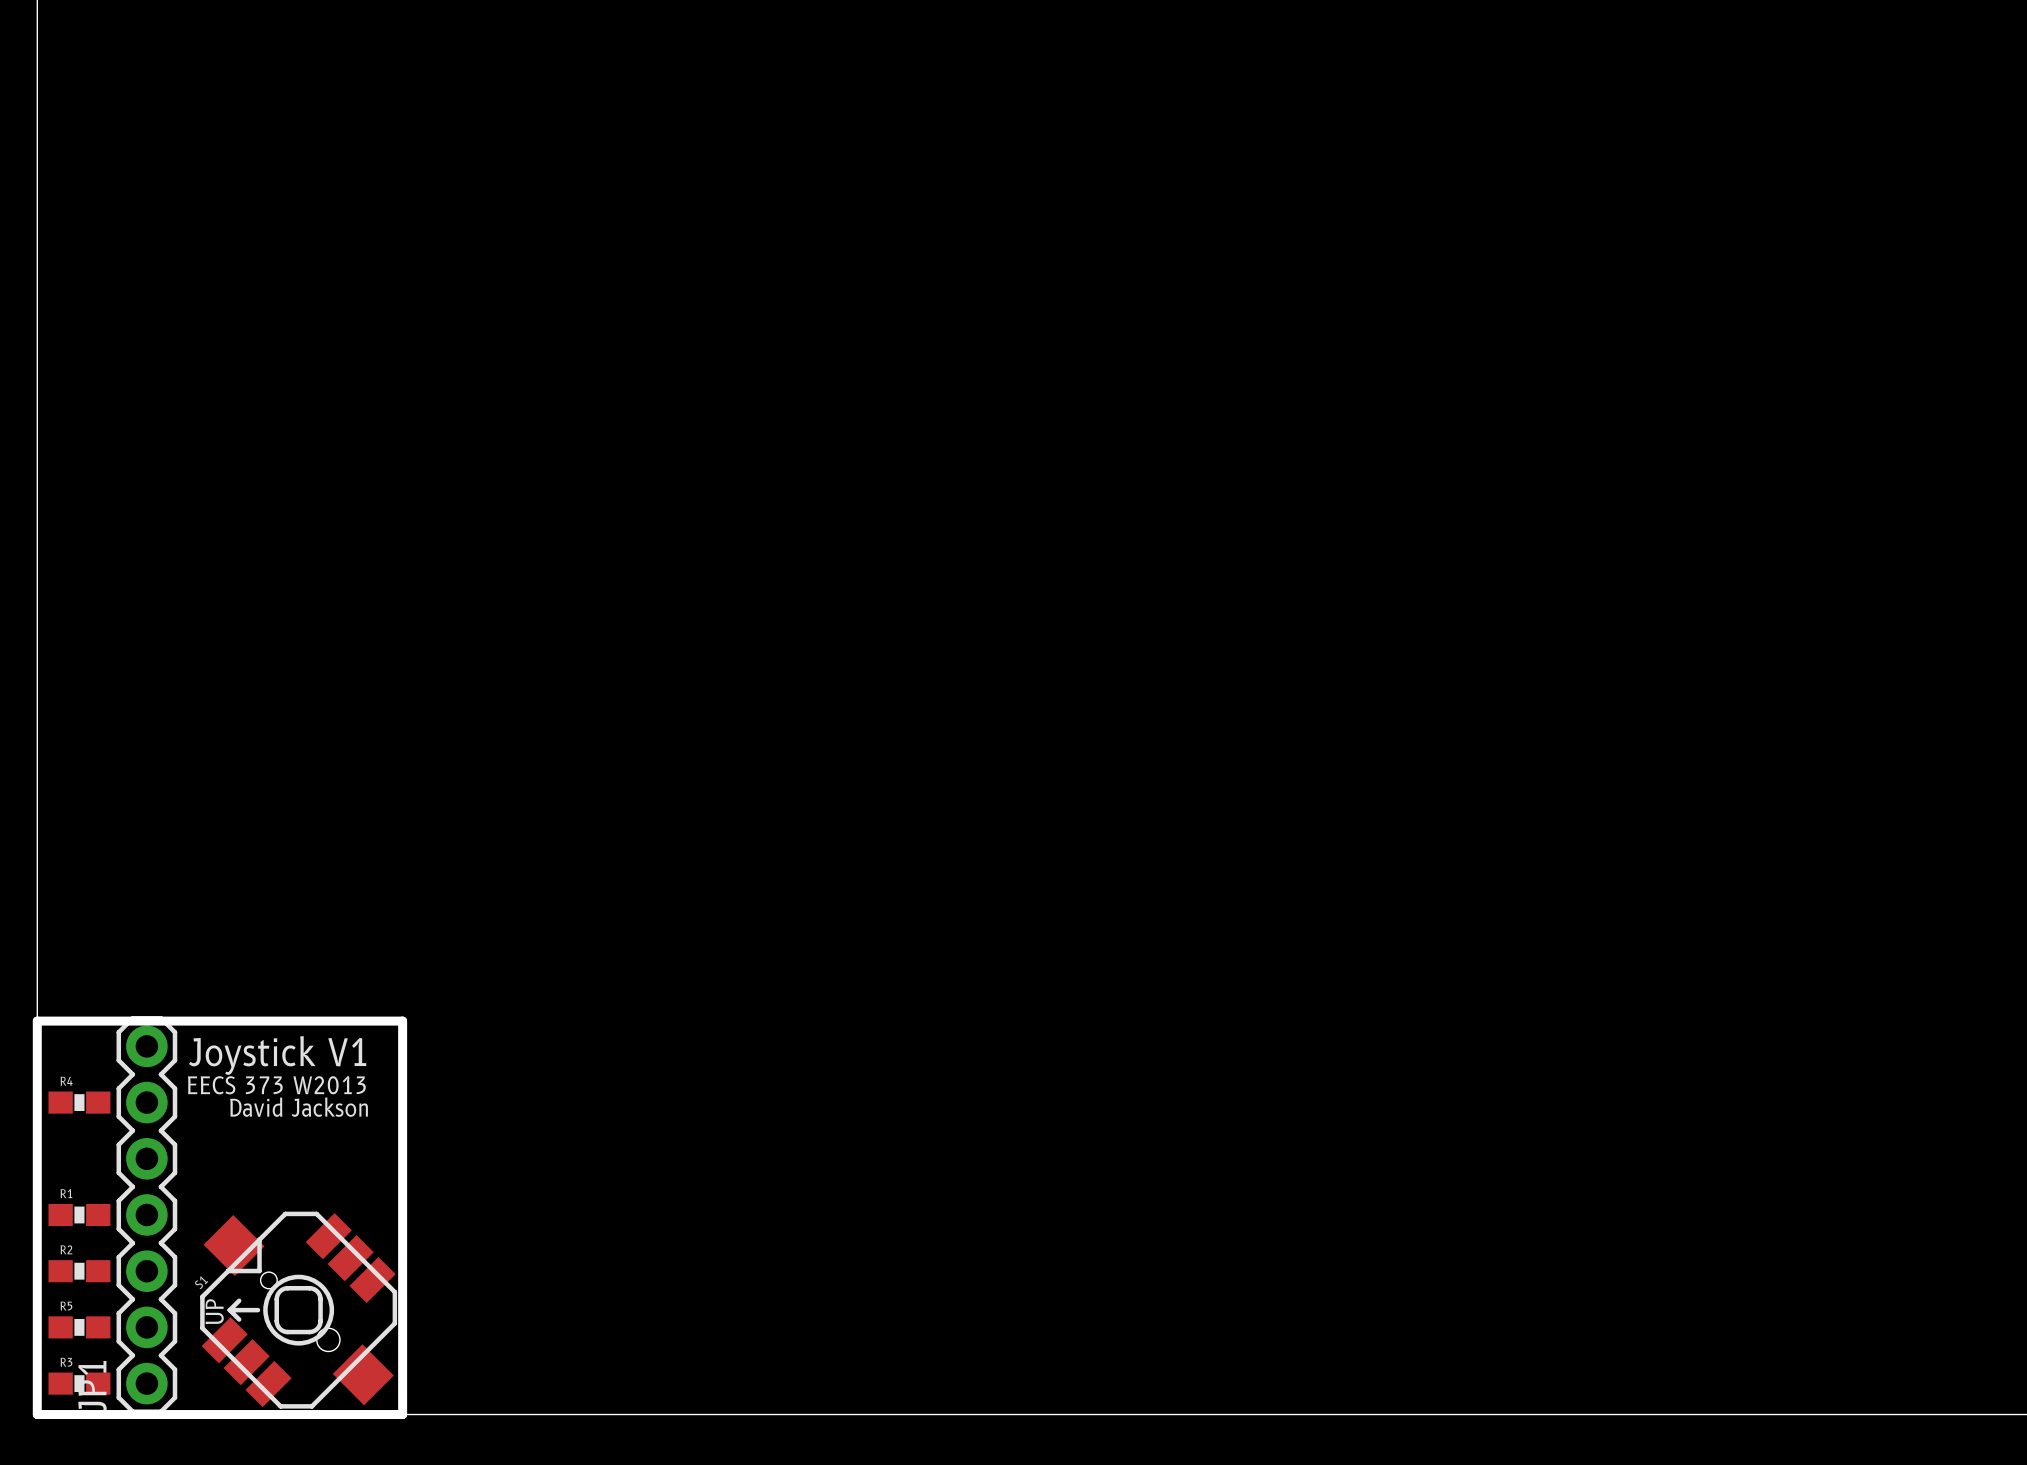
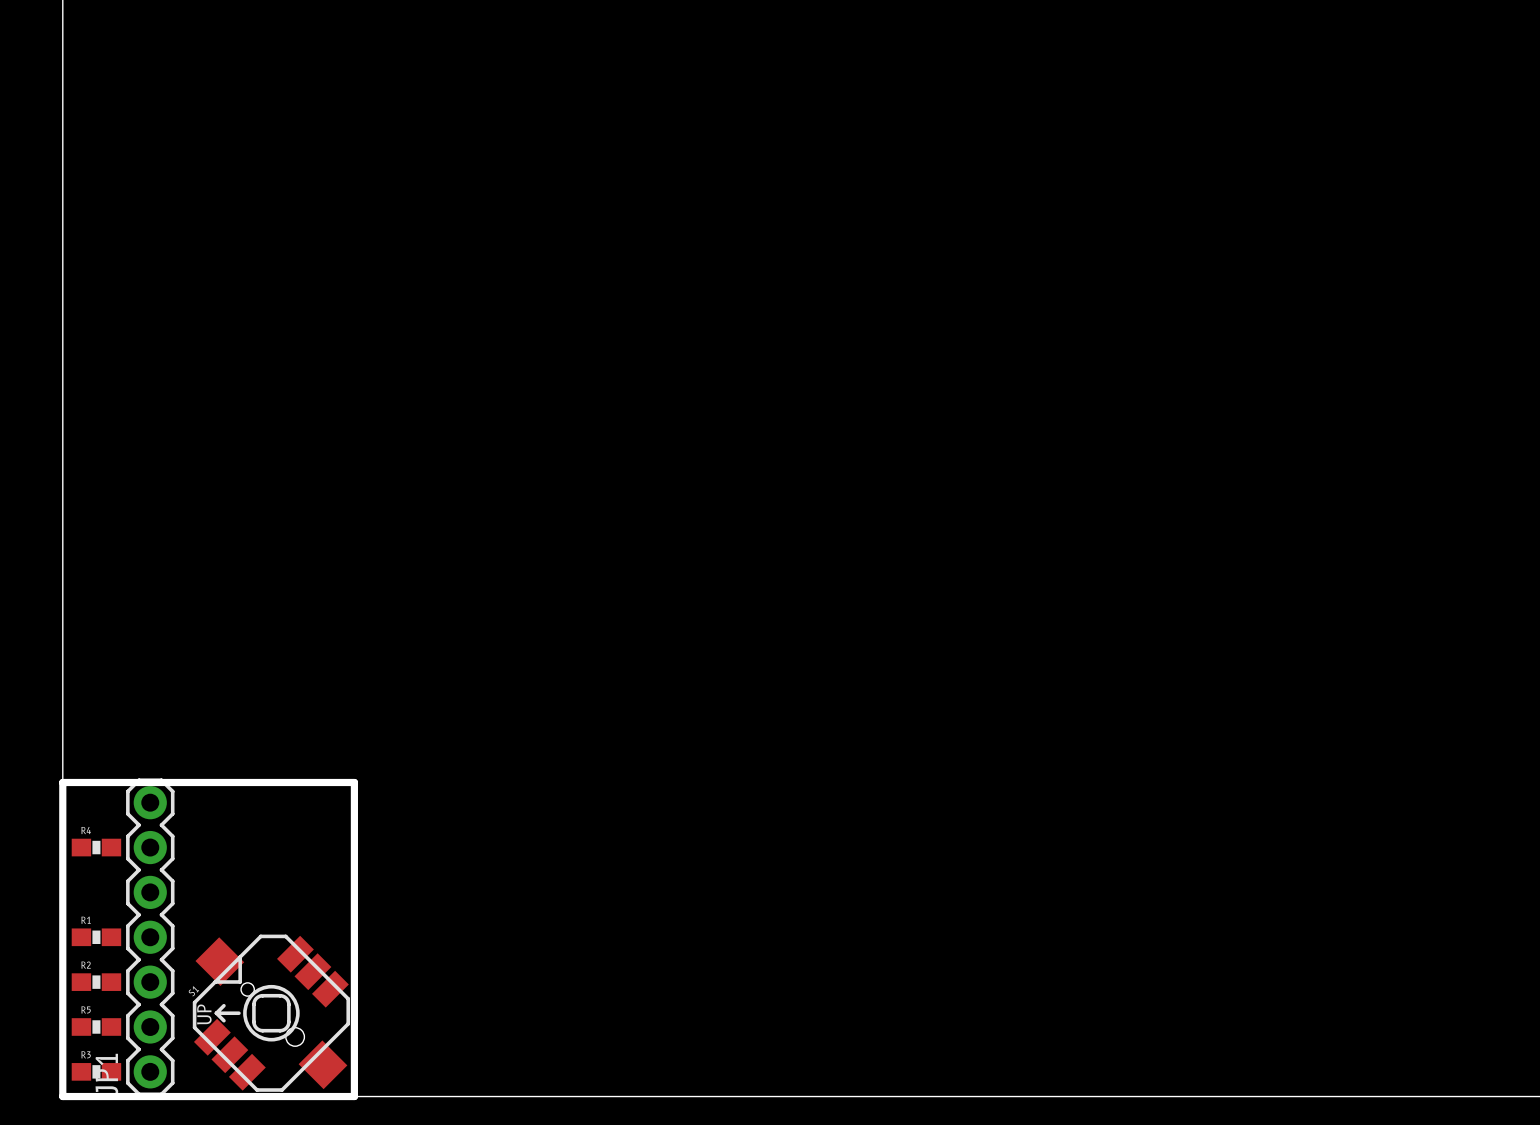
text: Joystick V1 (277, 1055) -> none
text: EECS 373 W2013 (276, 1085) -> none
text: David Jackson (299, 1107) -> none

